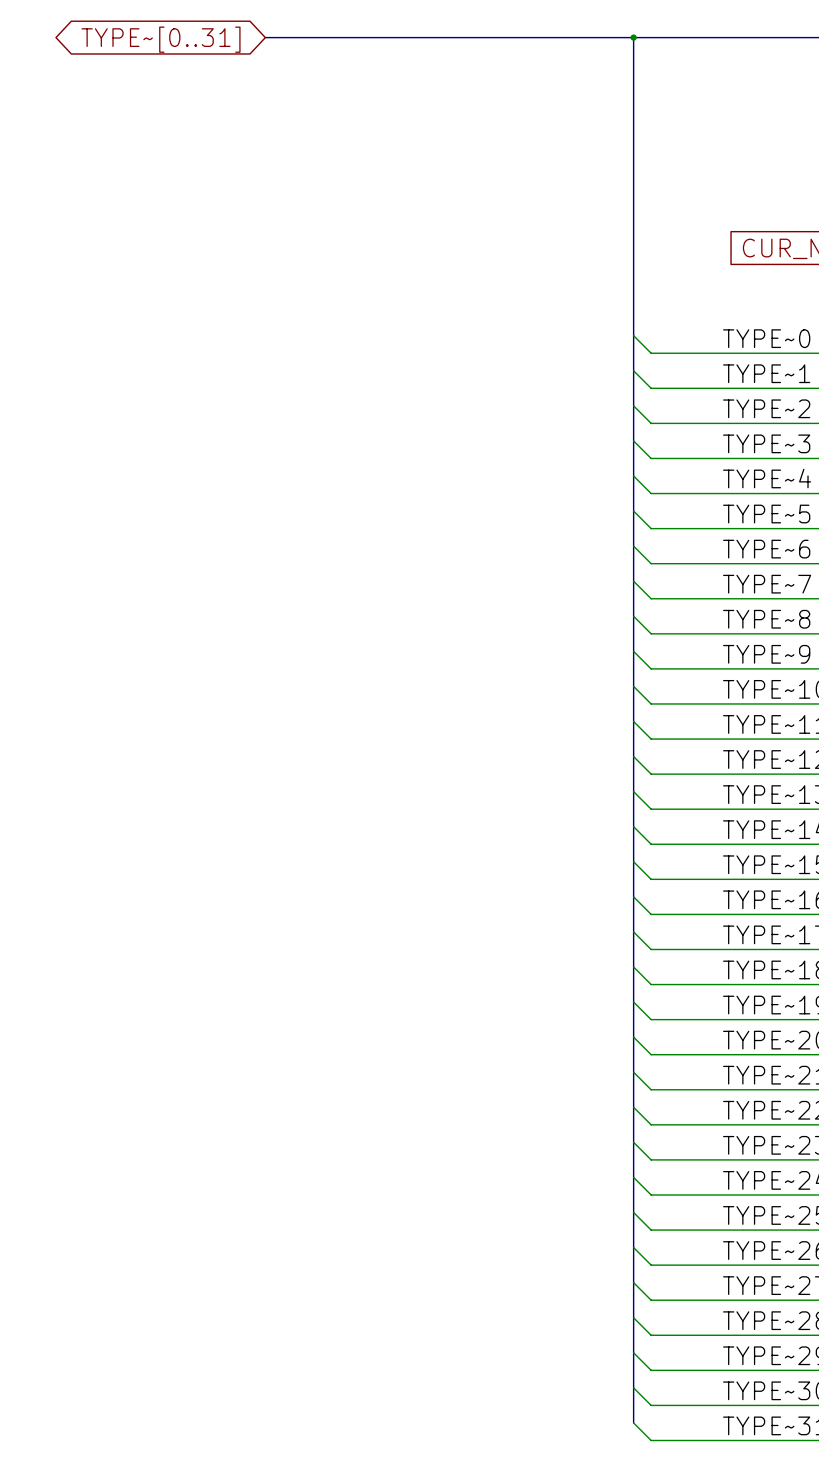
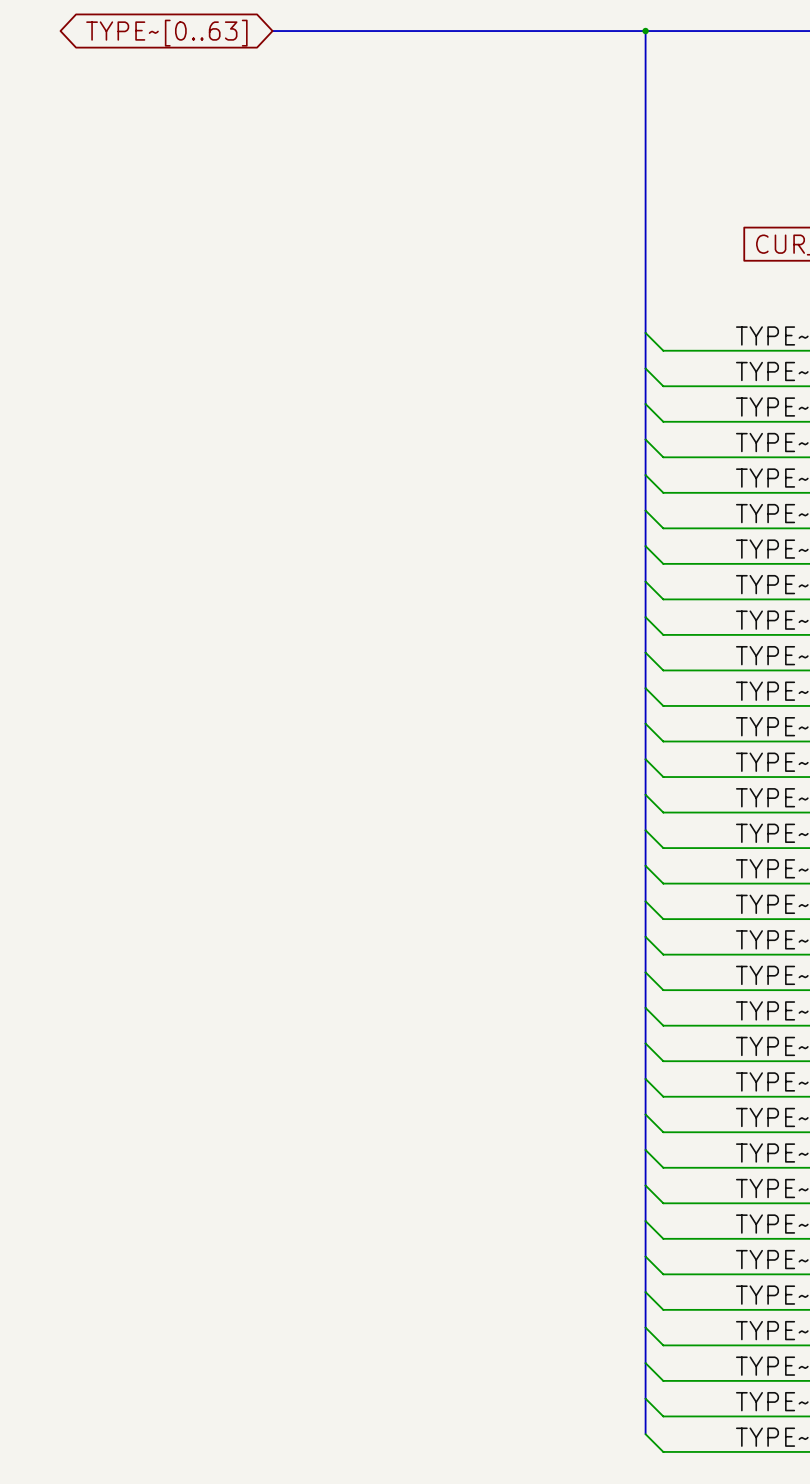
global label: TYPE~[0..31] (161, 39) -> TYPE~[0..63] (166, 33)

